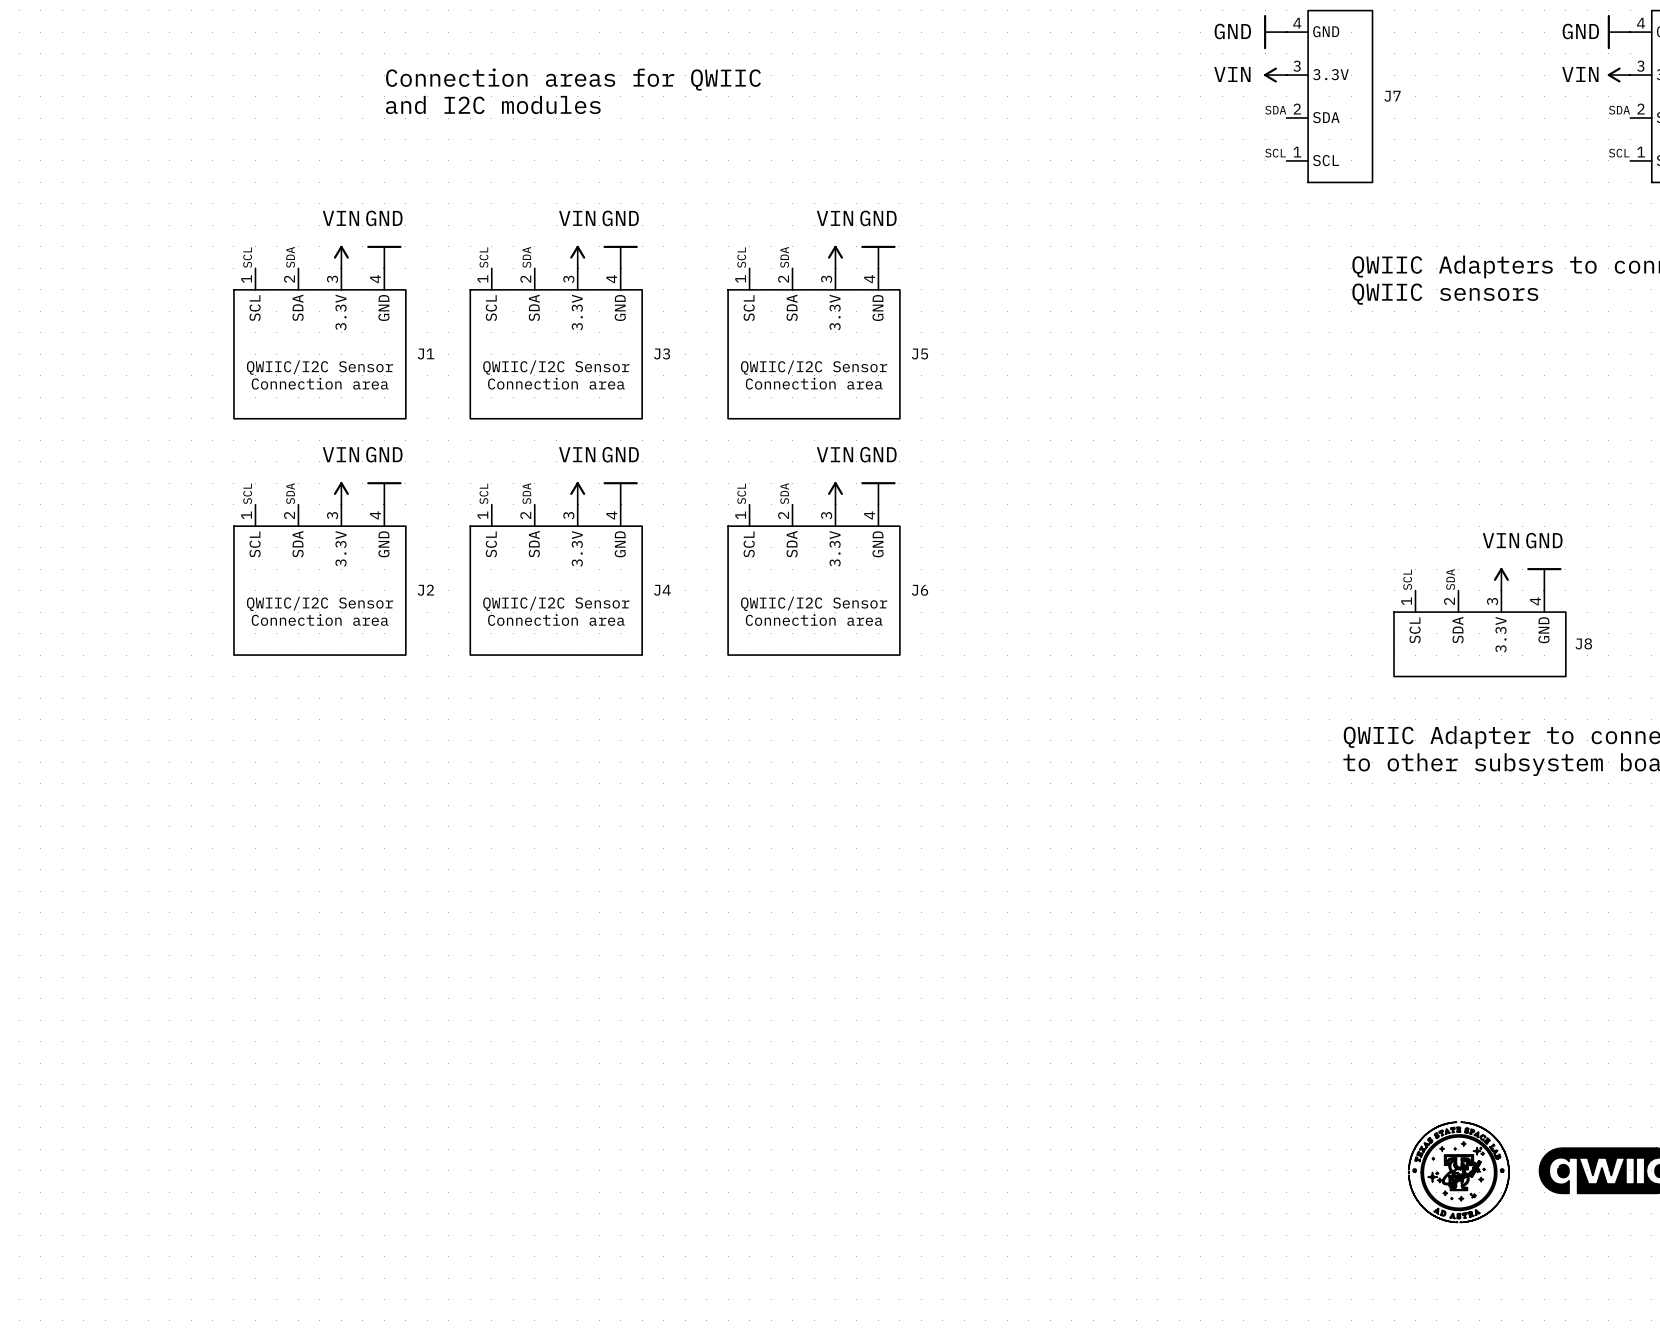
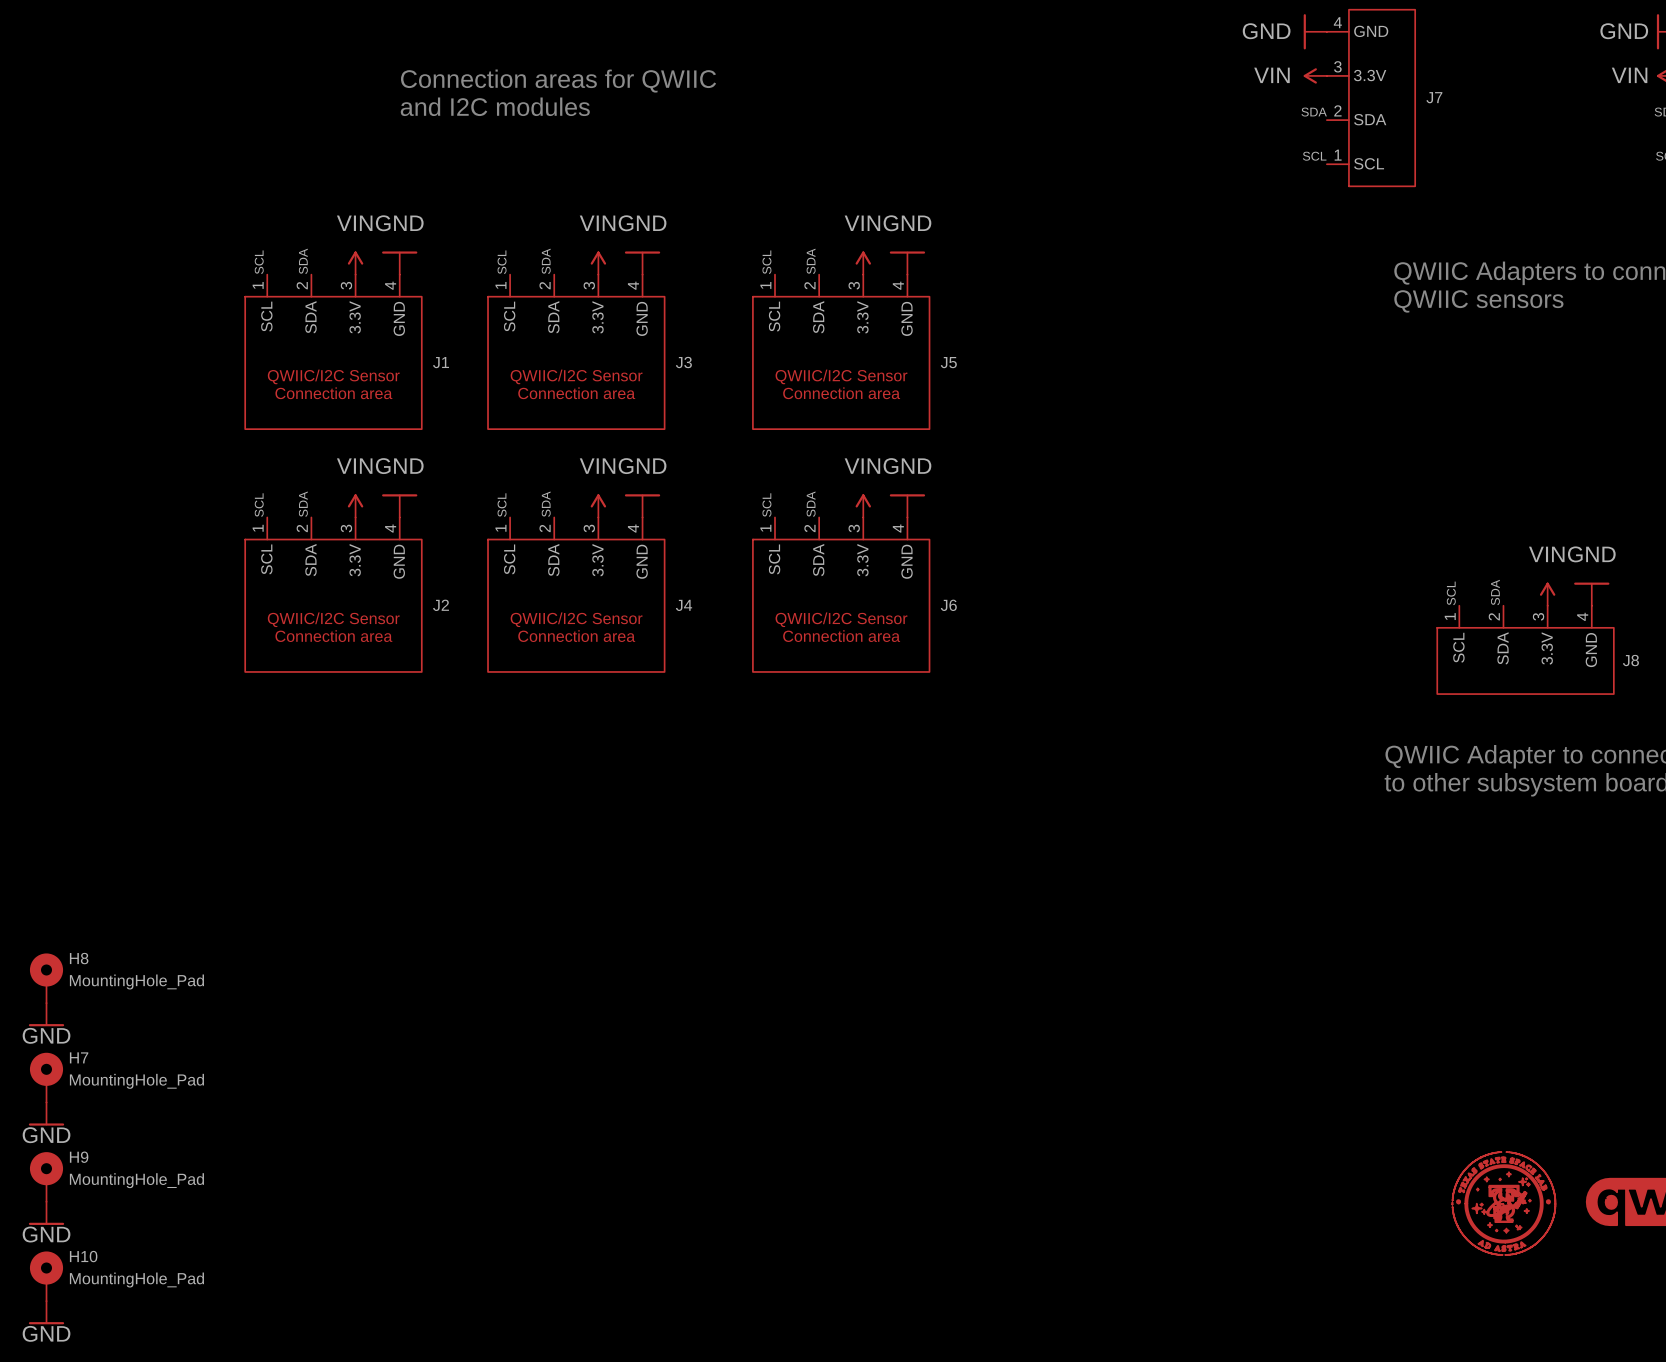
H8: none -> MountingHole_Pad (46, 978)
power symbol: none -> GND (46, 1014)
H7: none -> MountingHole_Pad (46, 1077)
power symbol: none -> GND (46, 1114)
H9: none -> MountingHole_Pad (46, 1176)
power symbol: none -> GND (46, 1213)
H10: none -> MountingHole_Pad (46, 1276)
power symbol: none -> GND (46, 1312)

